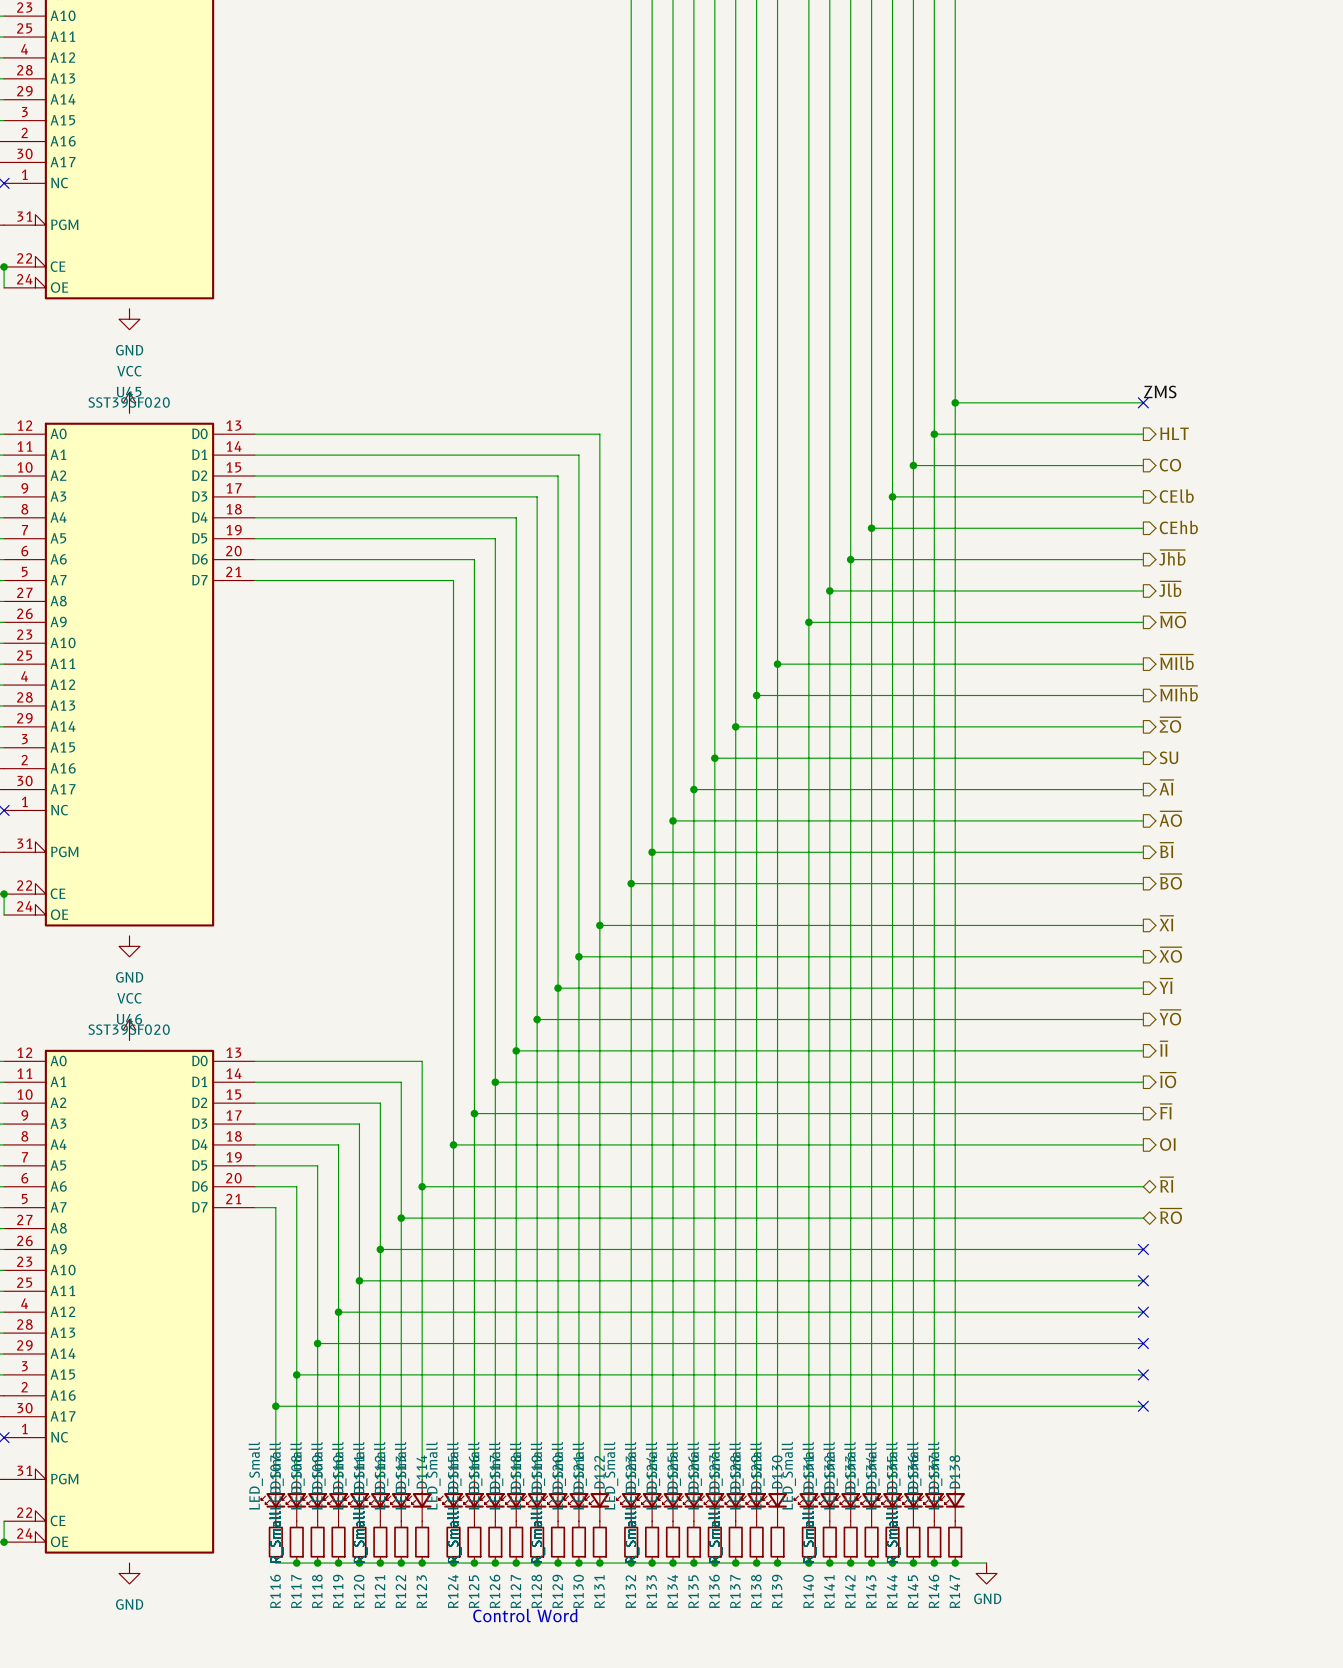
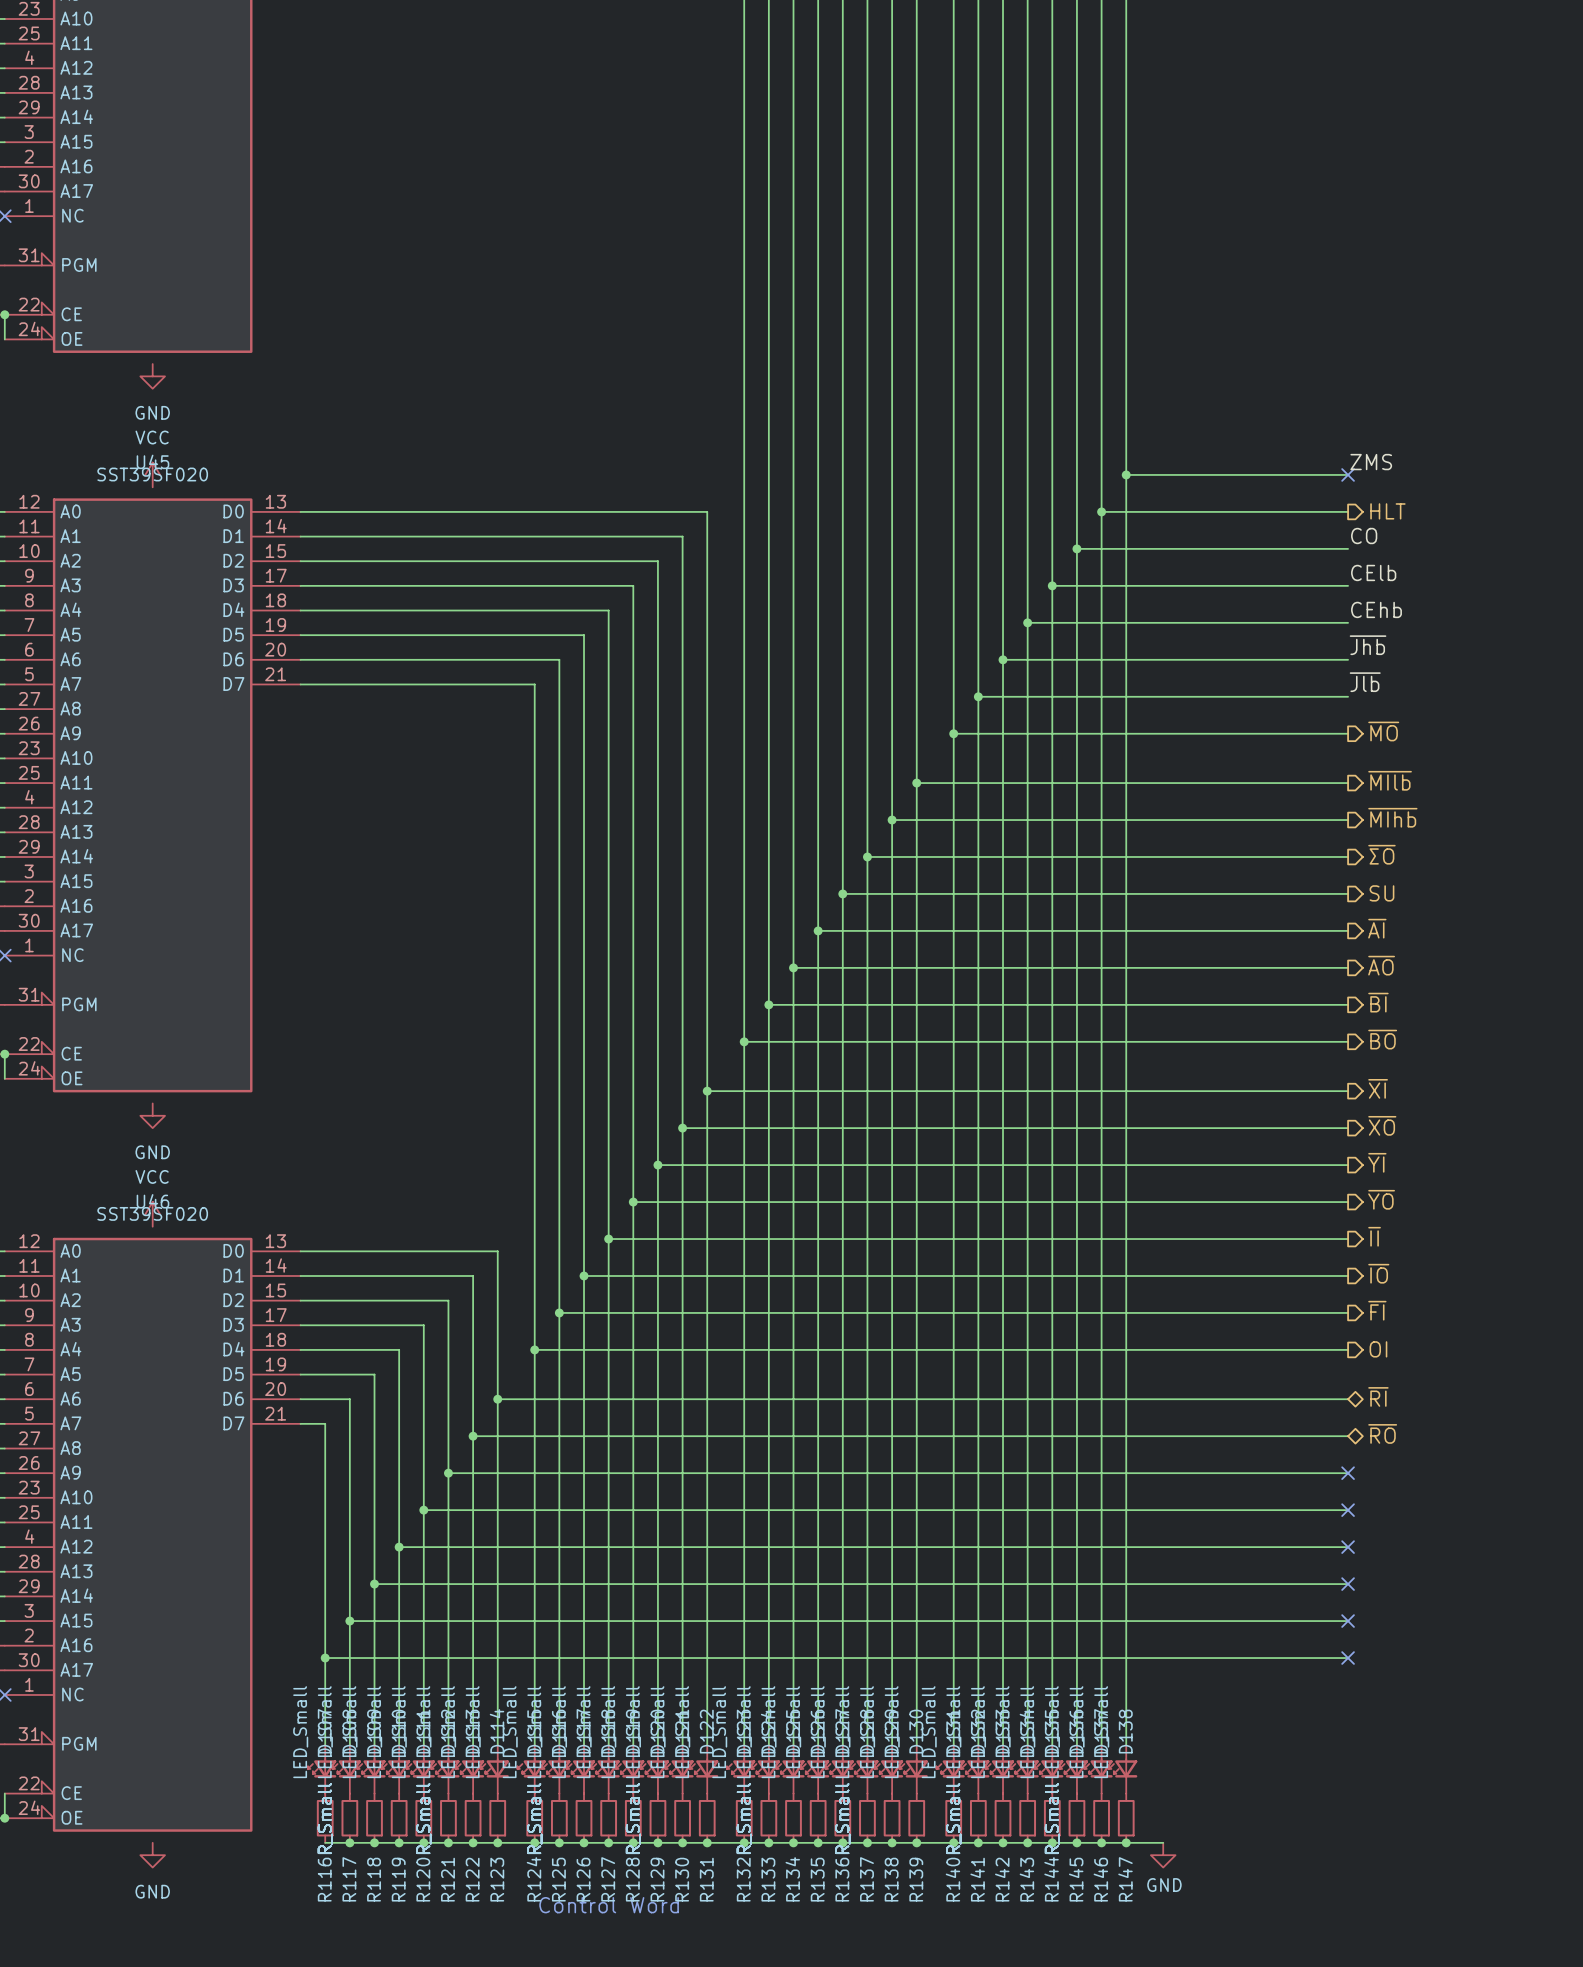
label: none -> CO (1364, 536)
hierarchical label: CO (1170, 465) -> none
label: none -> CElb (1373, 572)
hierarchical label: CElb (1176, 496) -> none
label: none -> CEhb (1376, 609)
hierarchical label: CEhb (1178, 527) -> none
label: none -> ~{Jhb} (1368, 645)
hierarchical label: ~{Jhb} (1172, 557) -> none
label: none -> ~{Jlb} (1365, 682)
hierarchical label: ~{Jlb} (1170, 589) -> none

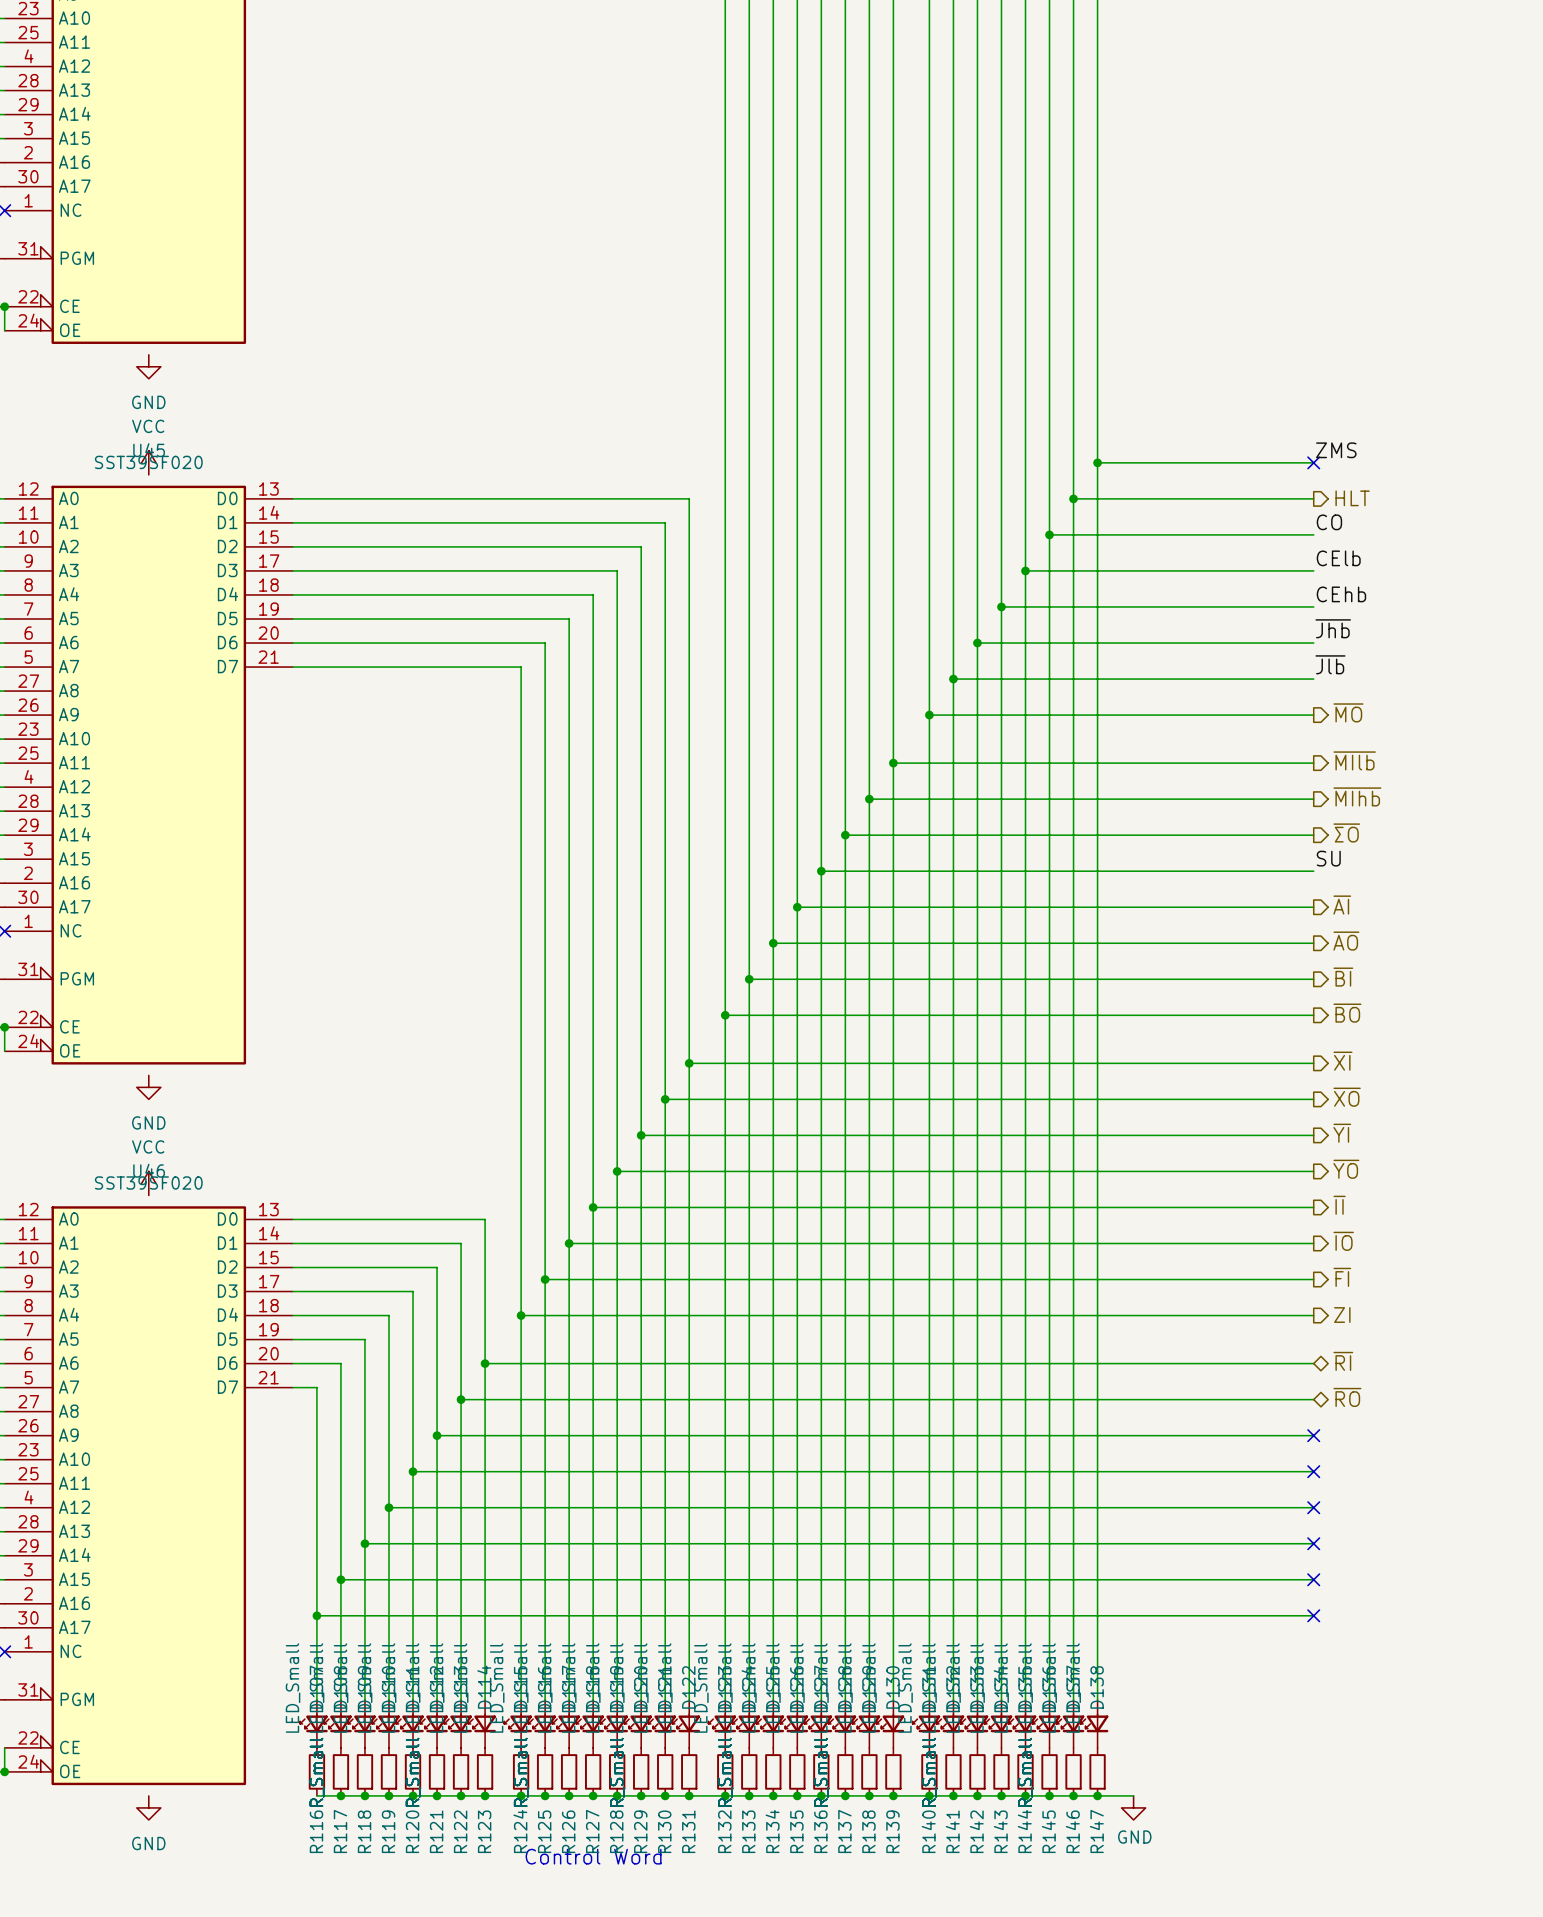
label: none -> SU (1328, 858)
hierarchical label: SU (1381, 893) -> none
hierarchical label: OI (1378, 1349) -> ZI (1342, 1315)

